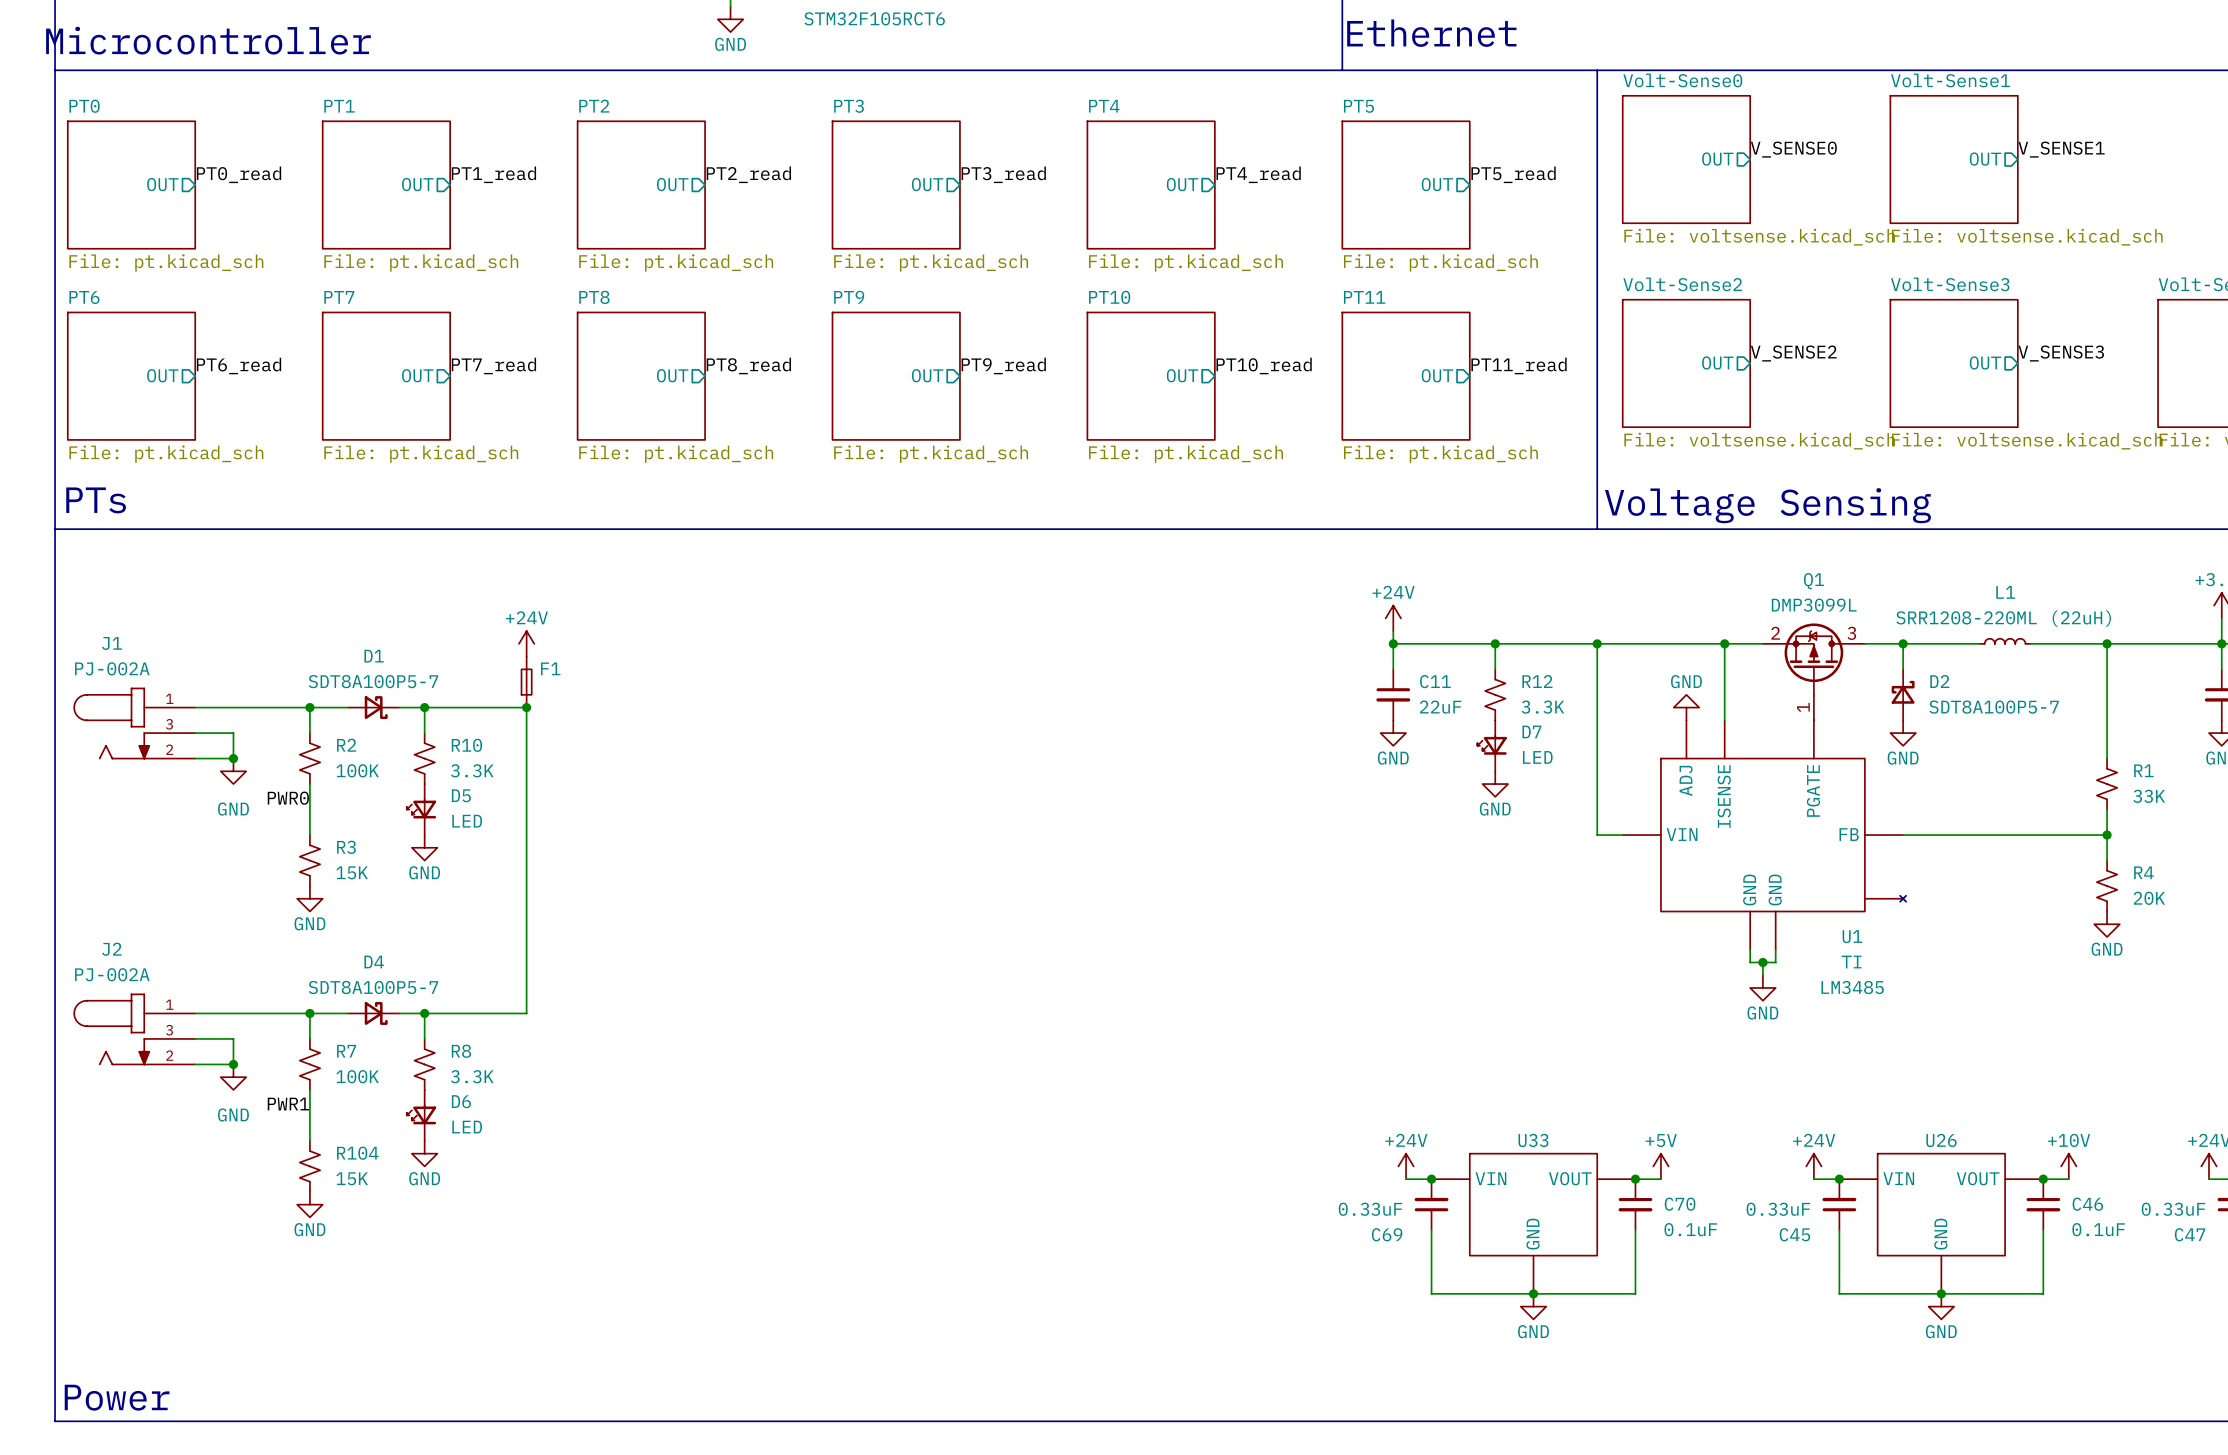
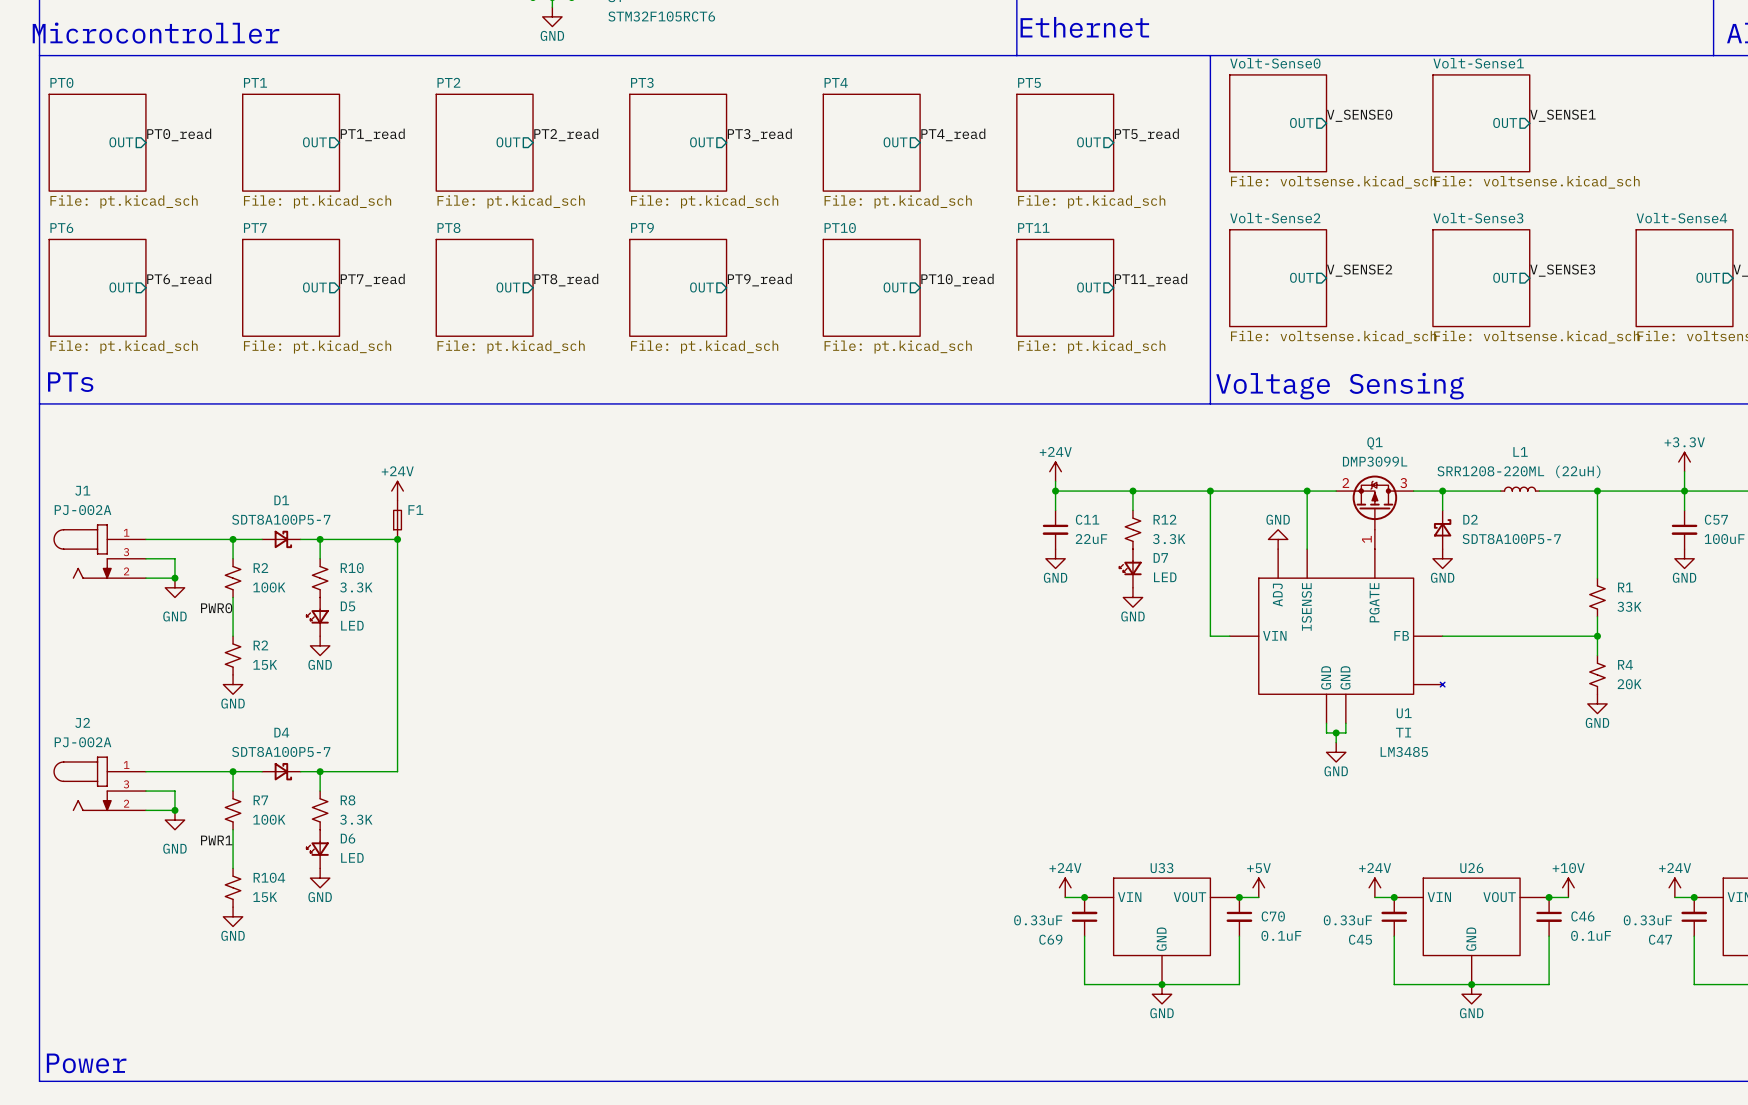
R3 name: R3 (346, 847) -> R2 (260, 645)

